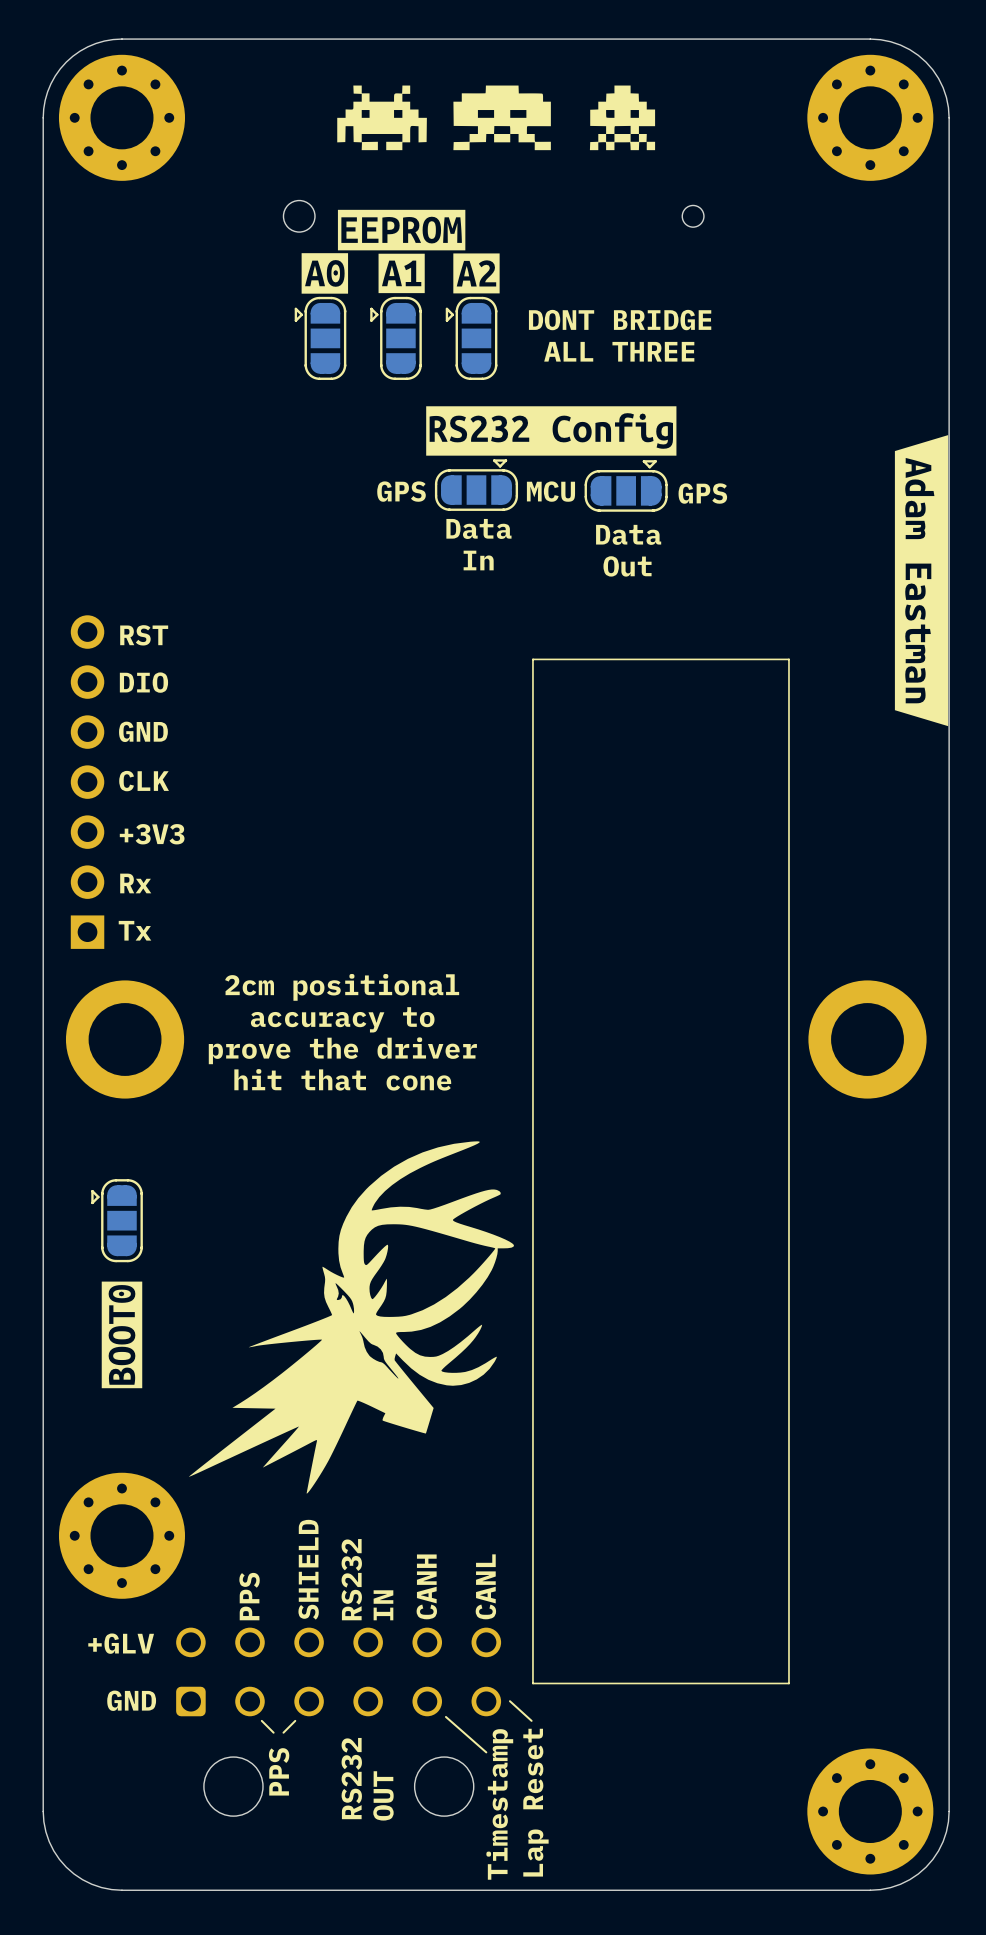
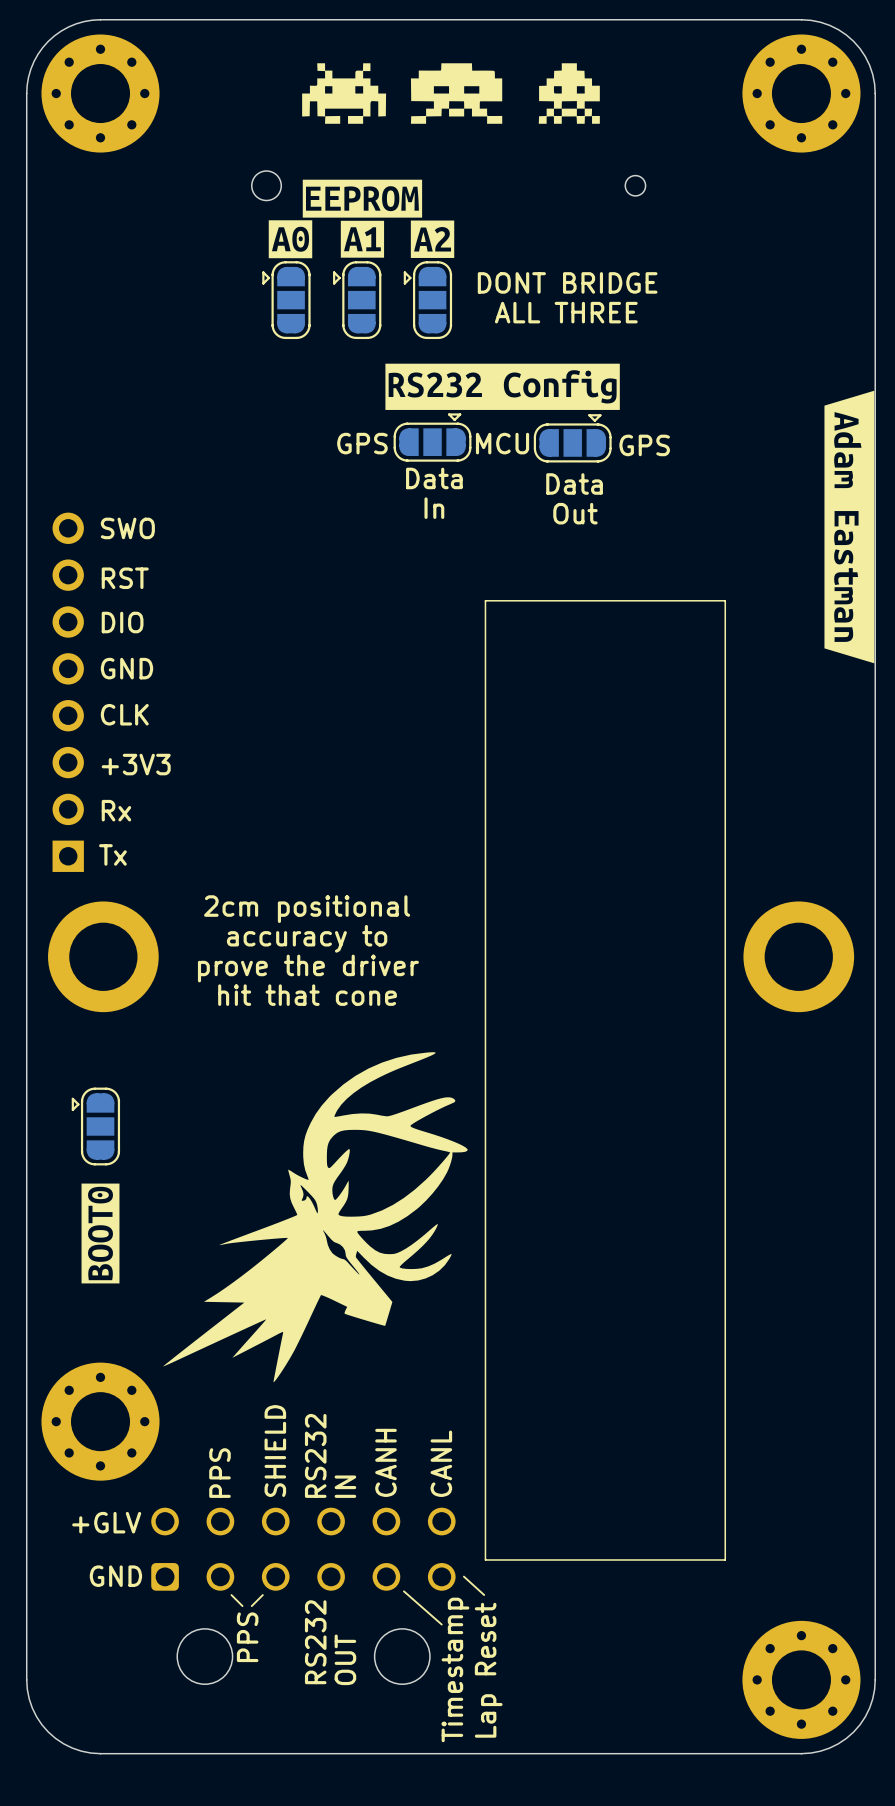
text: none -> SWO (127, 528)
part: none -> (68, 692)

